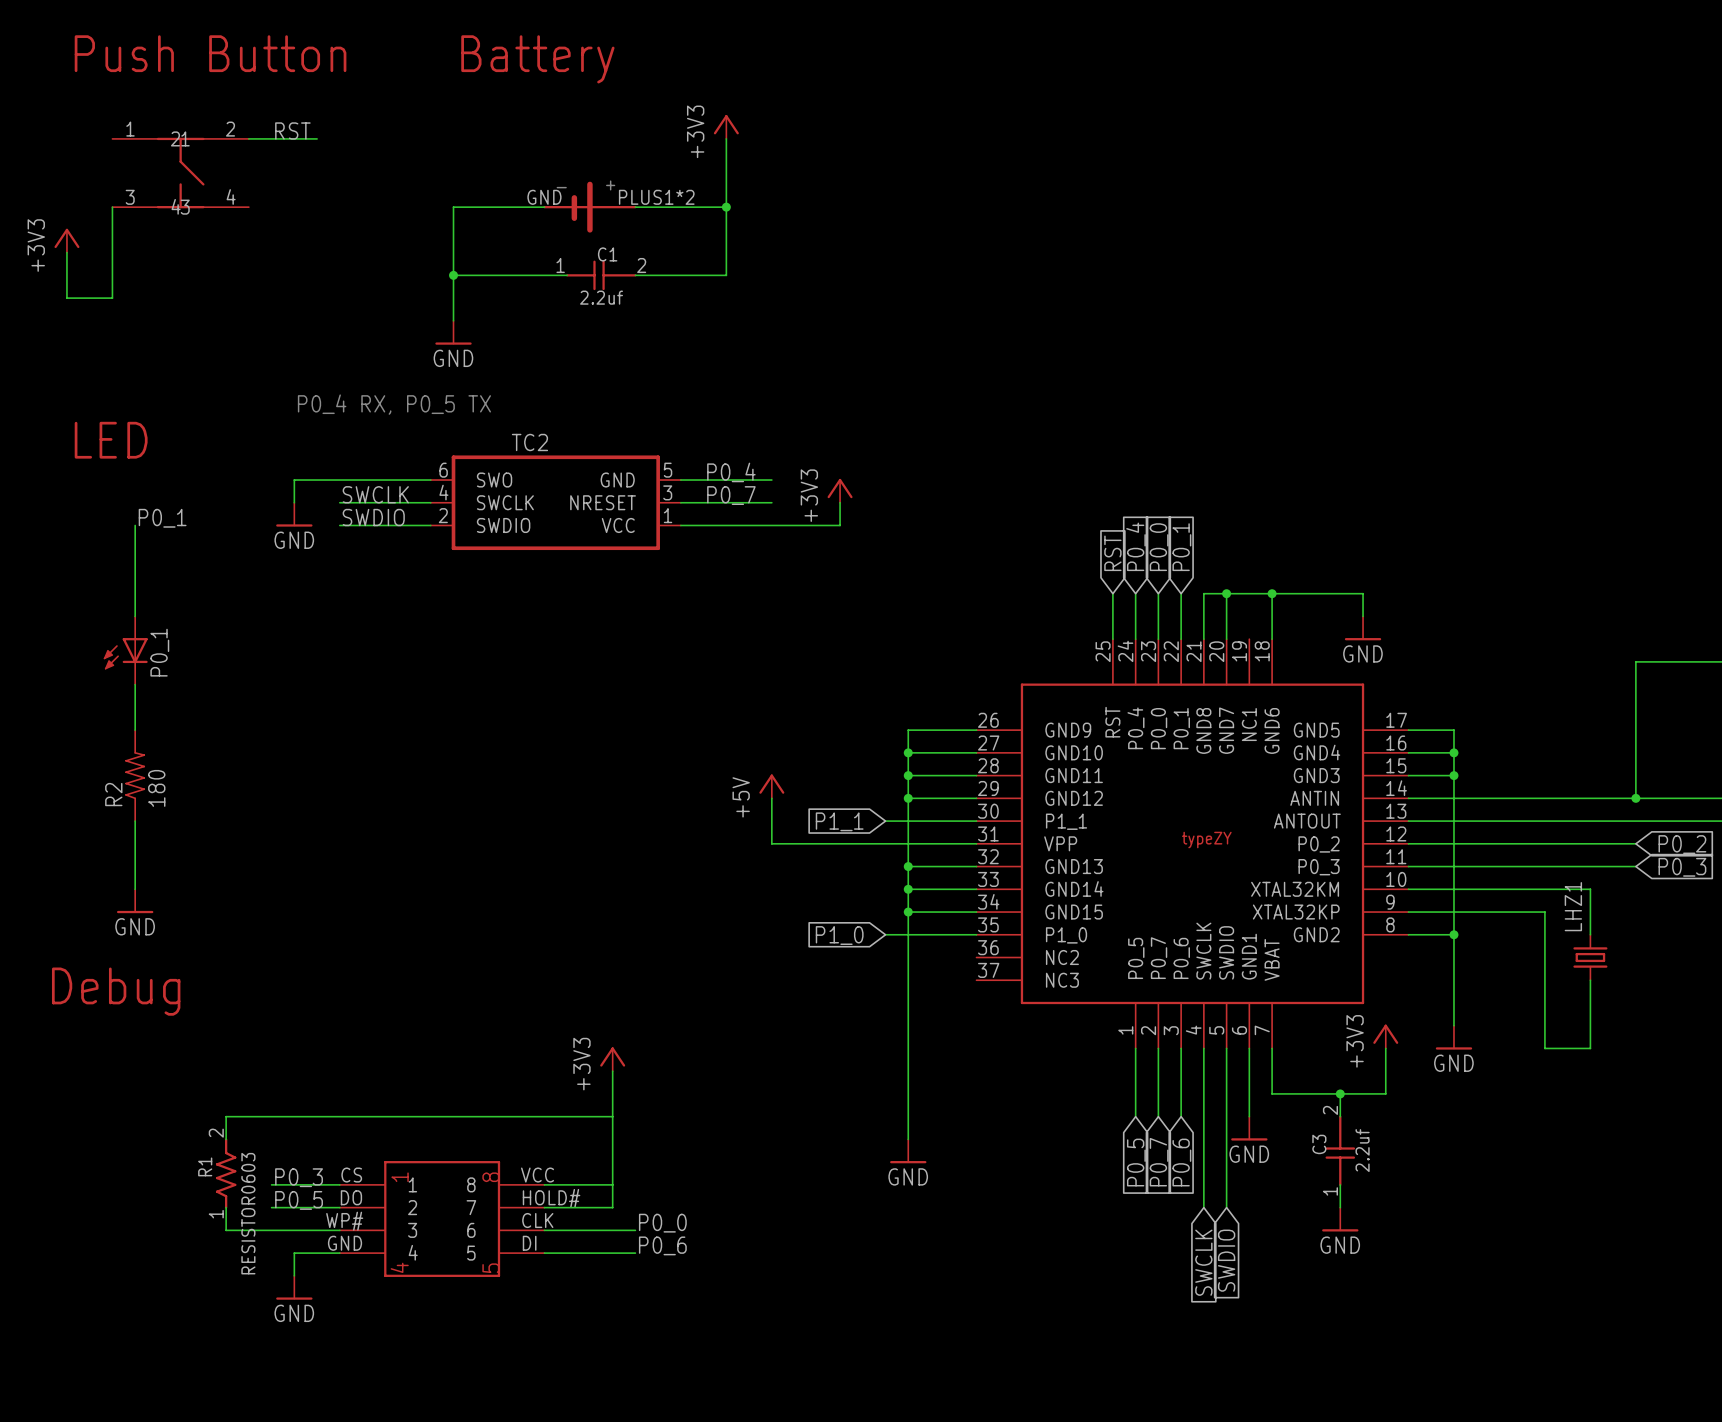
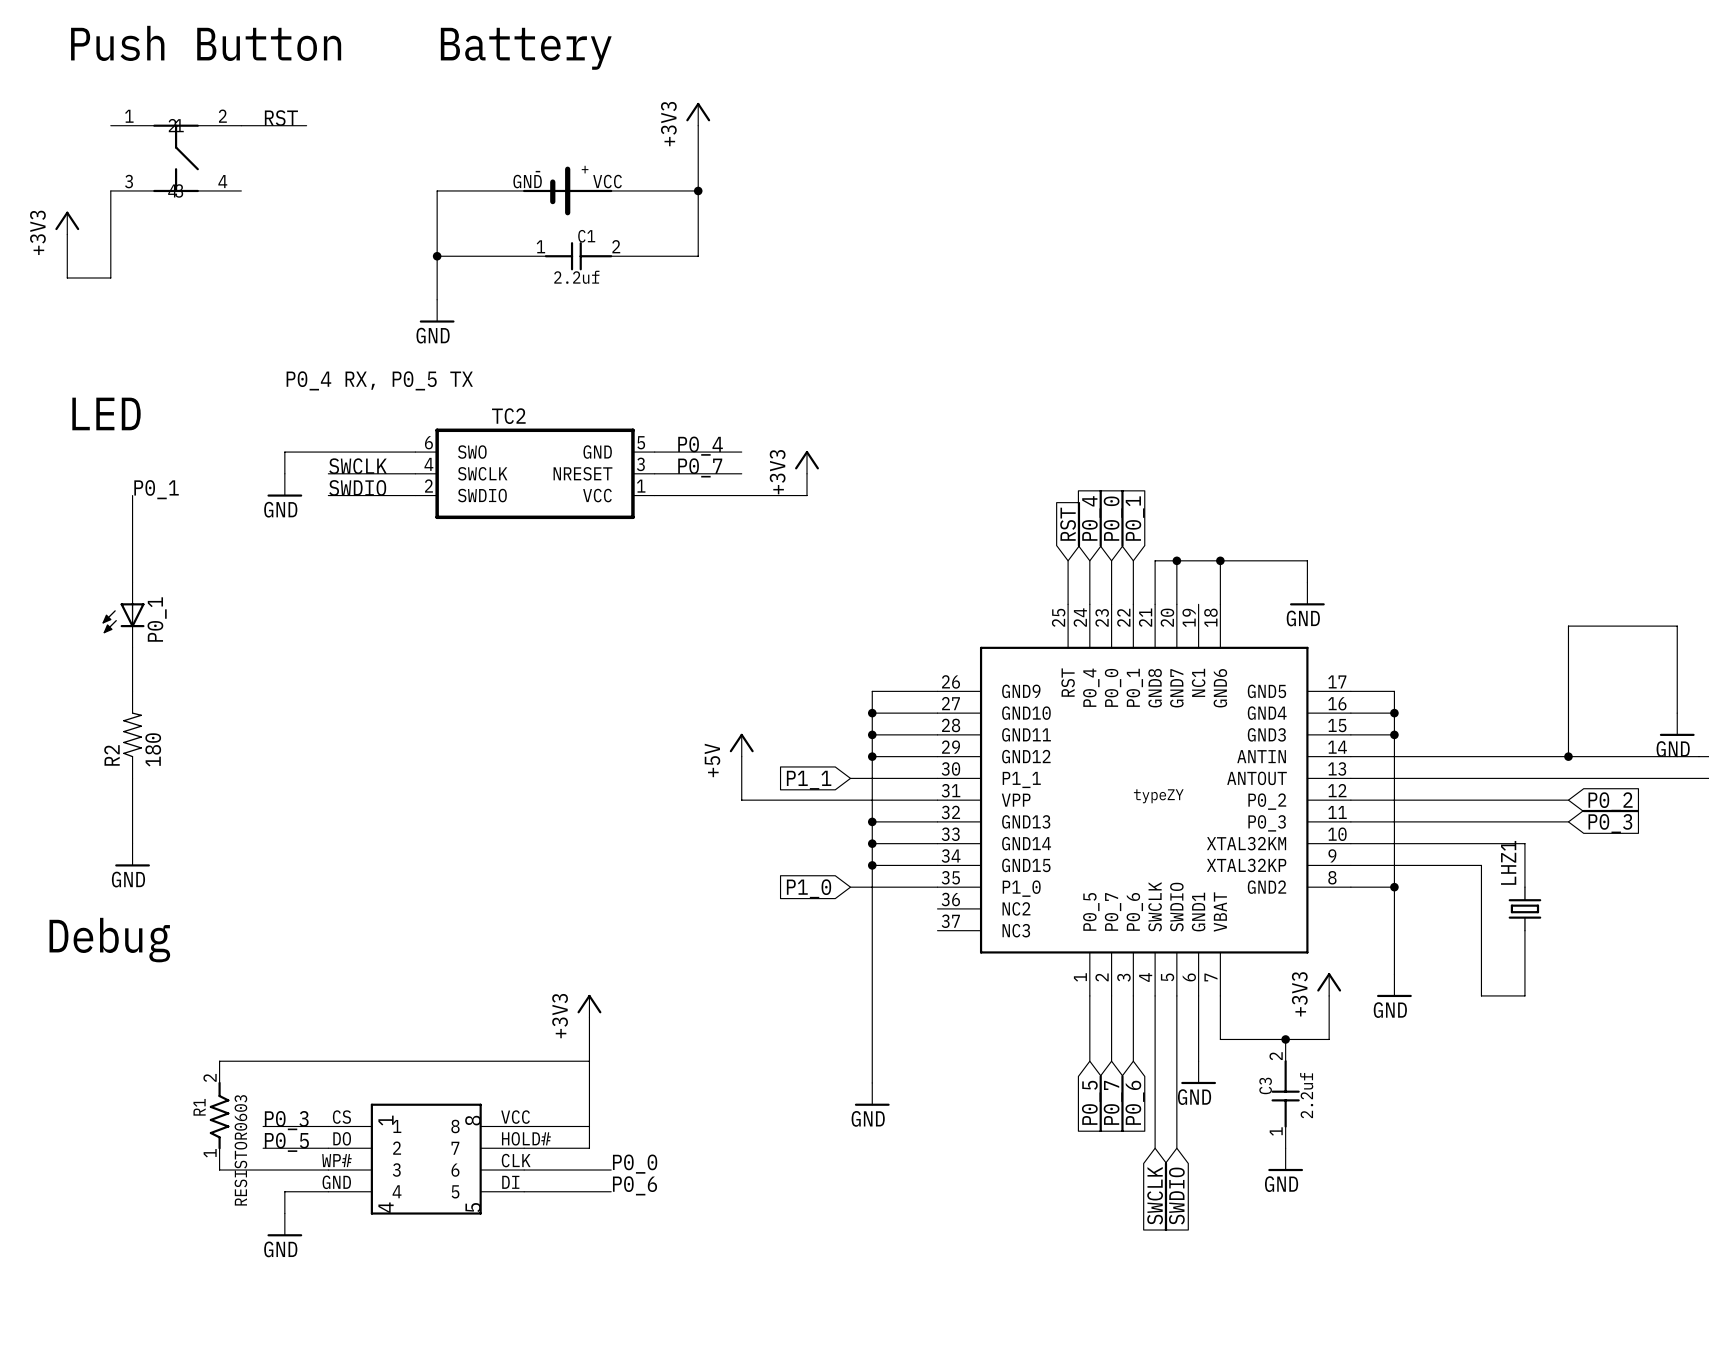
part pin number: PLUS1*2 (656, 197) -> VCC (607, 181)

